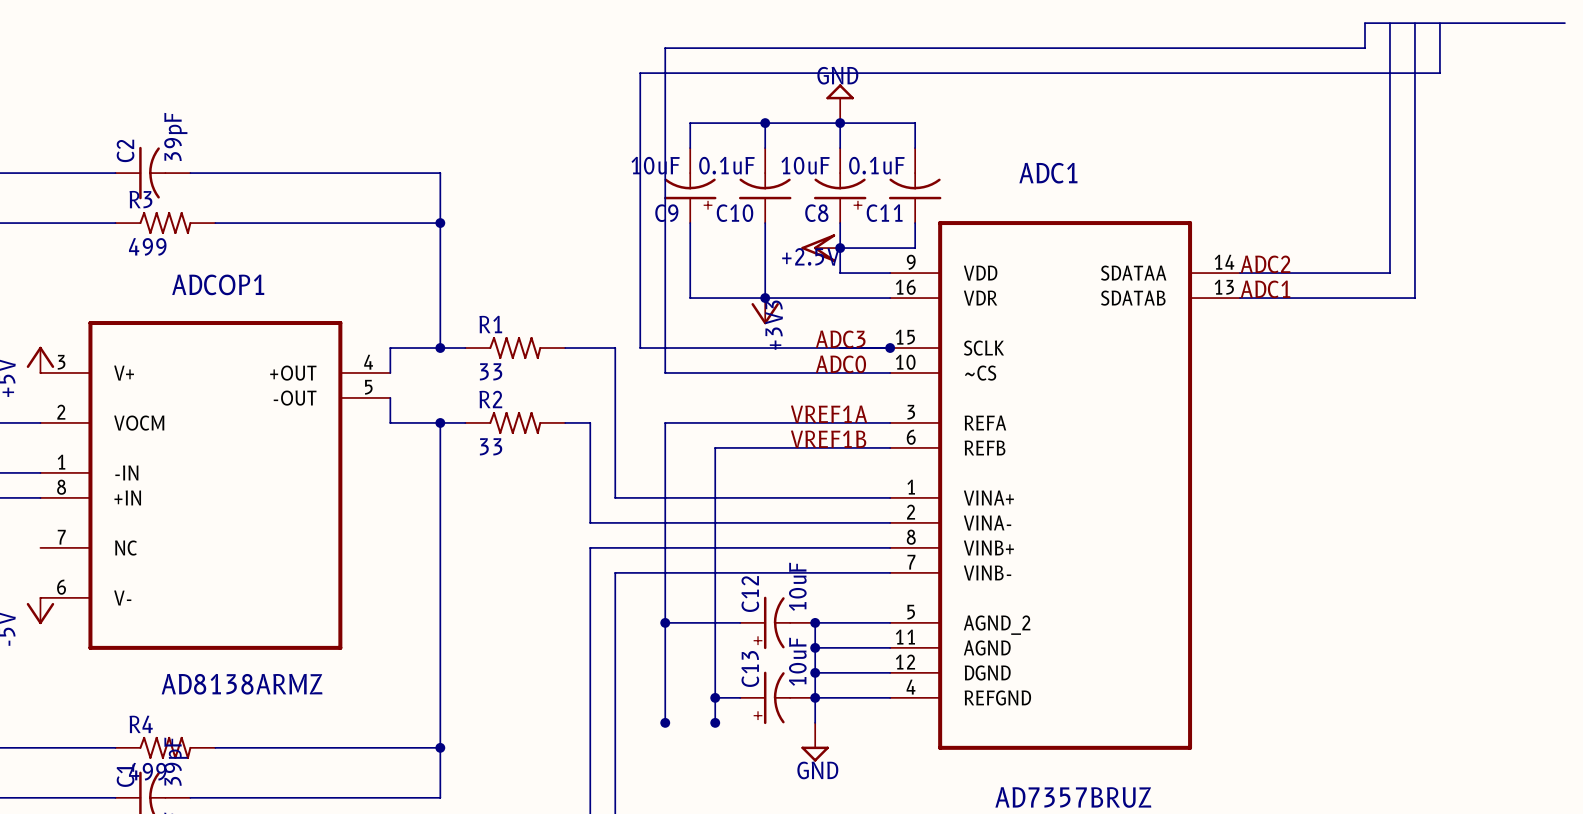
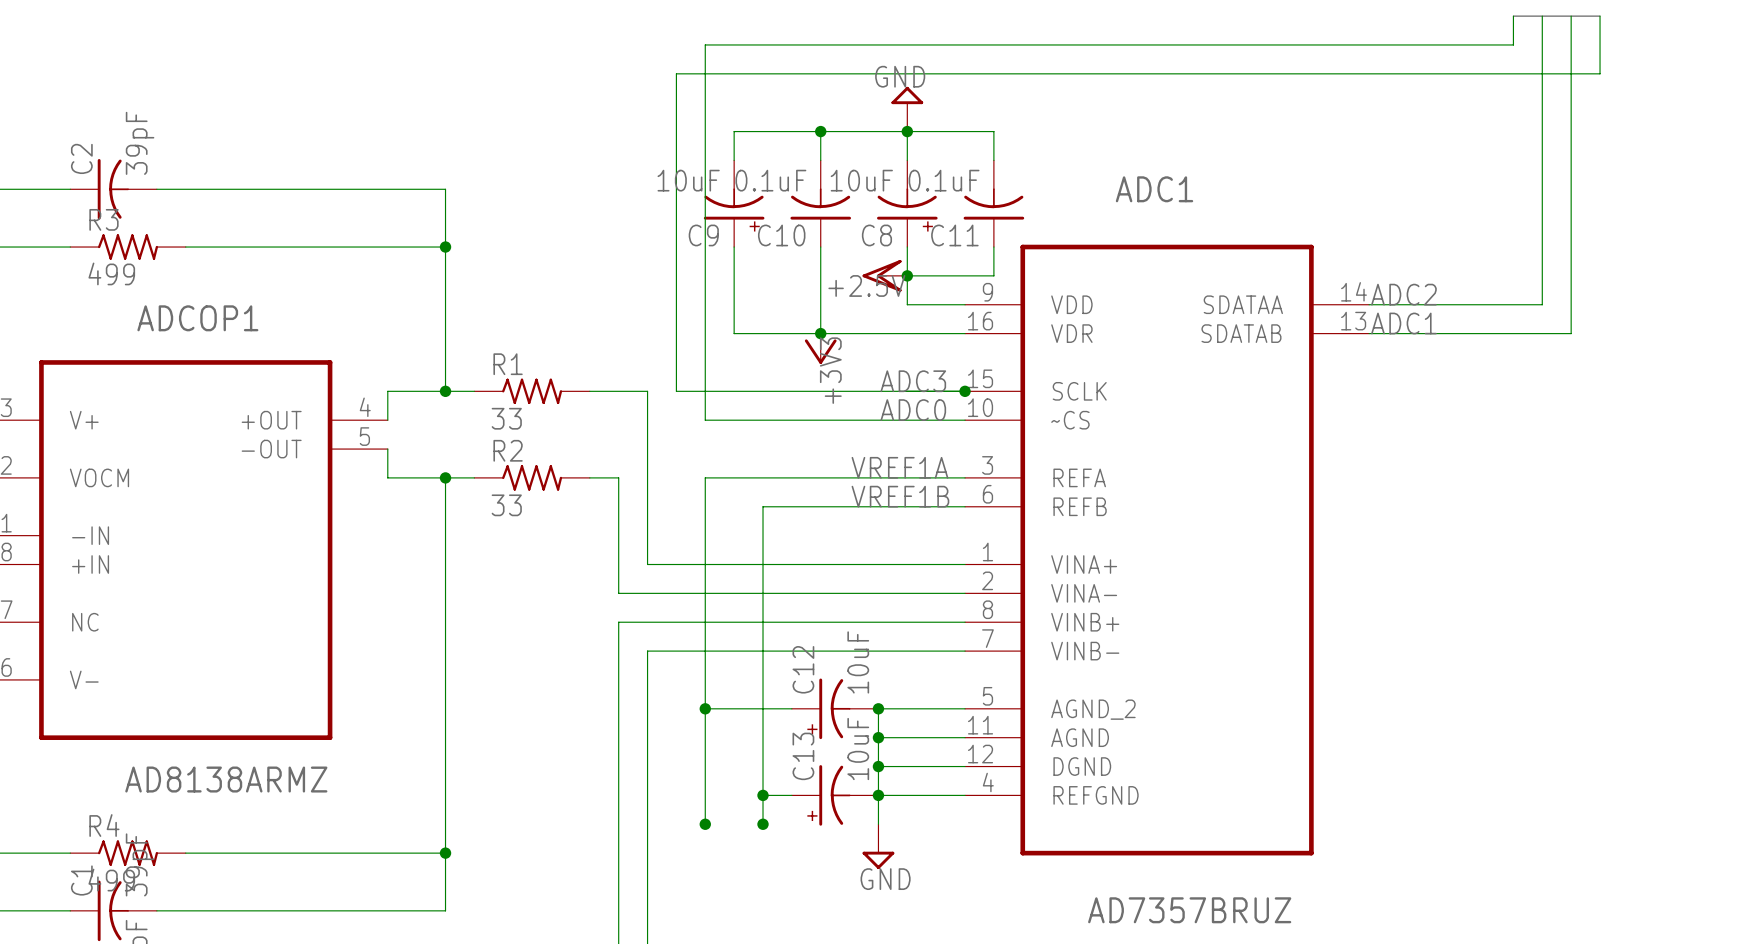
bus: (1439, 23) (1564, 23) -> none

